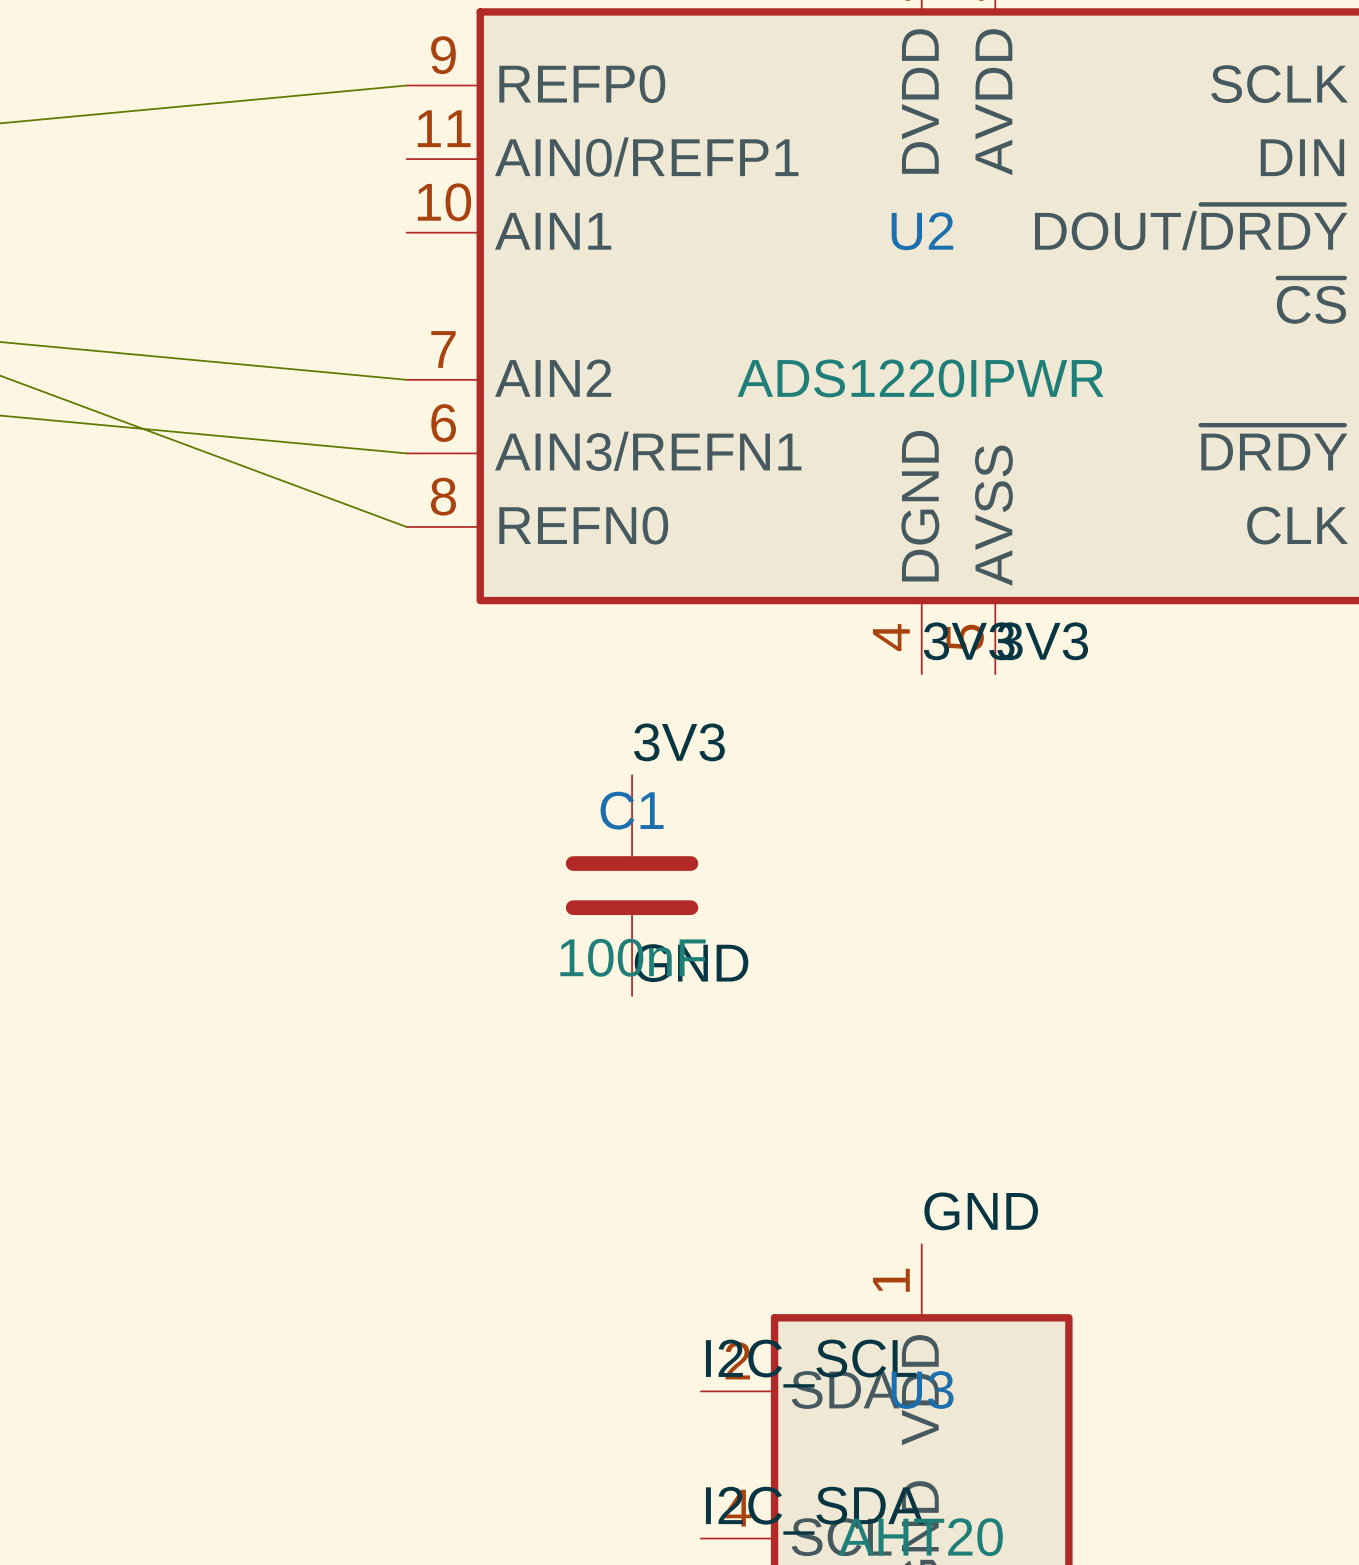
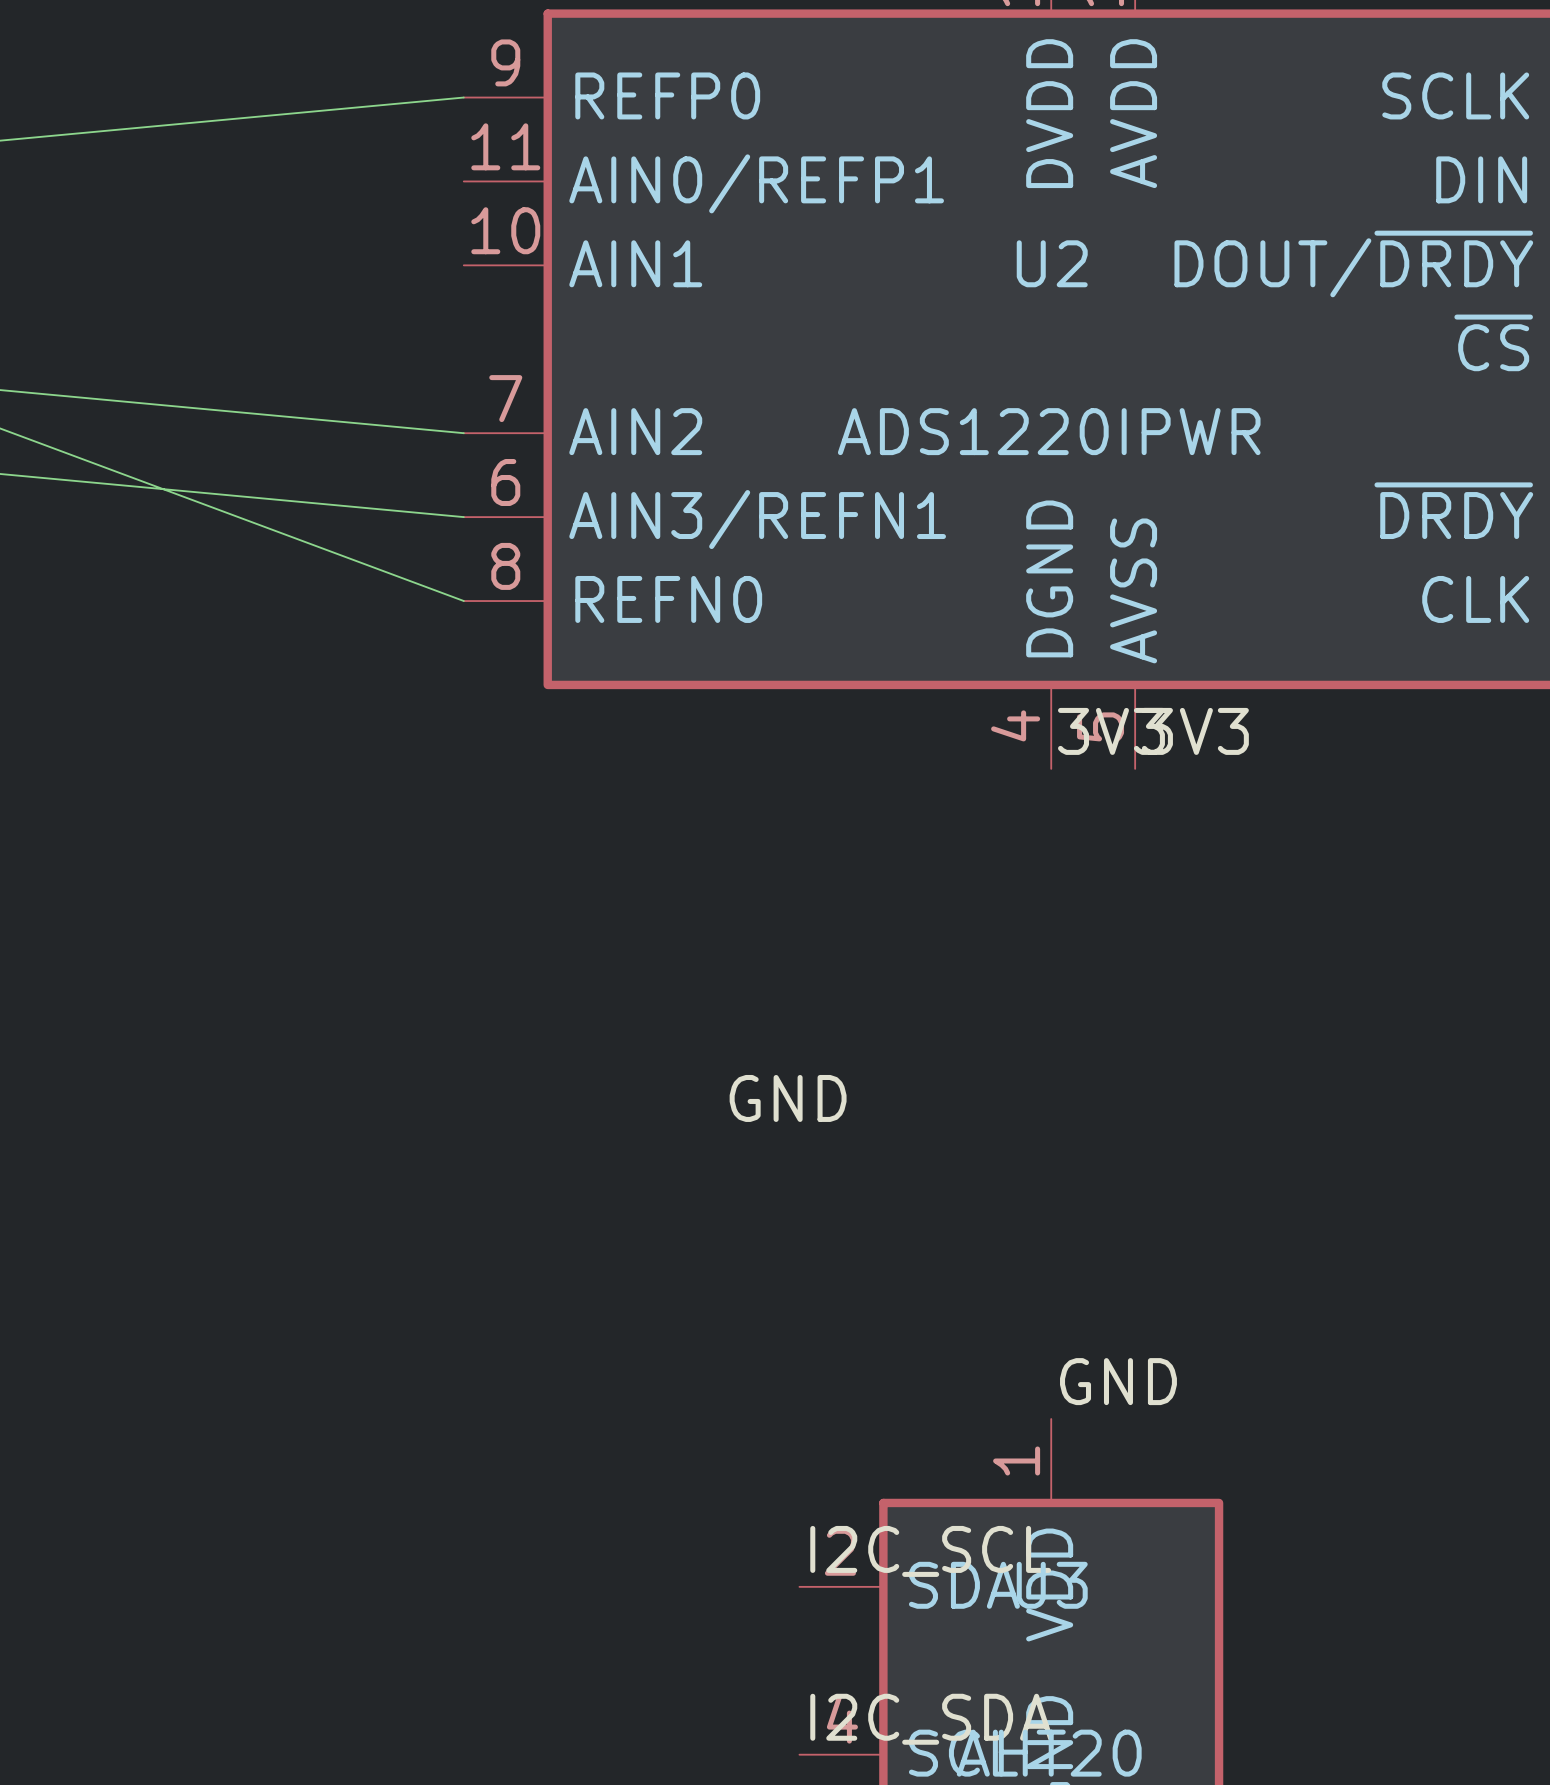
label: 3V3 (679, 742) -> none
C1: 100nF (632, 885) -> none

